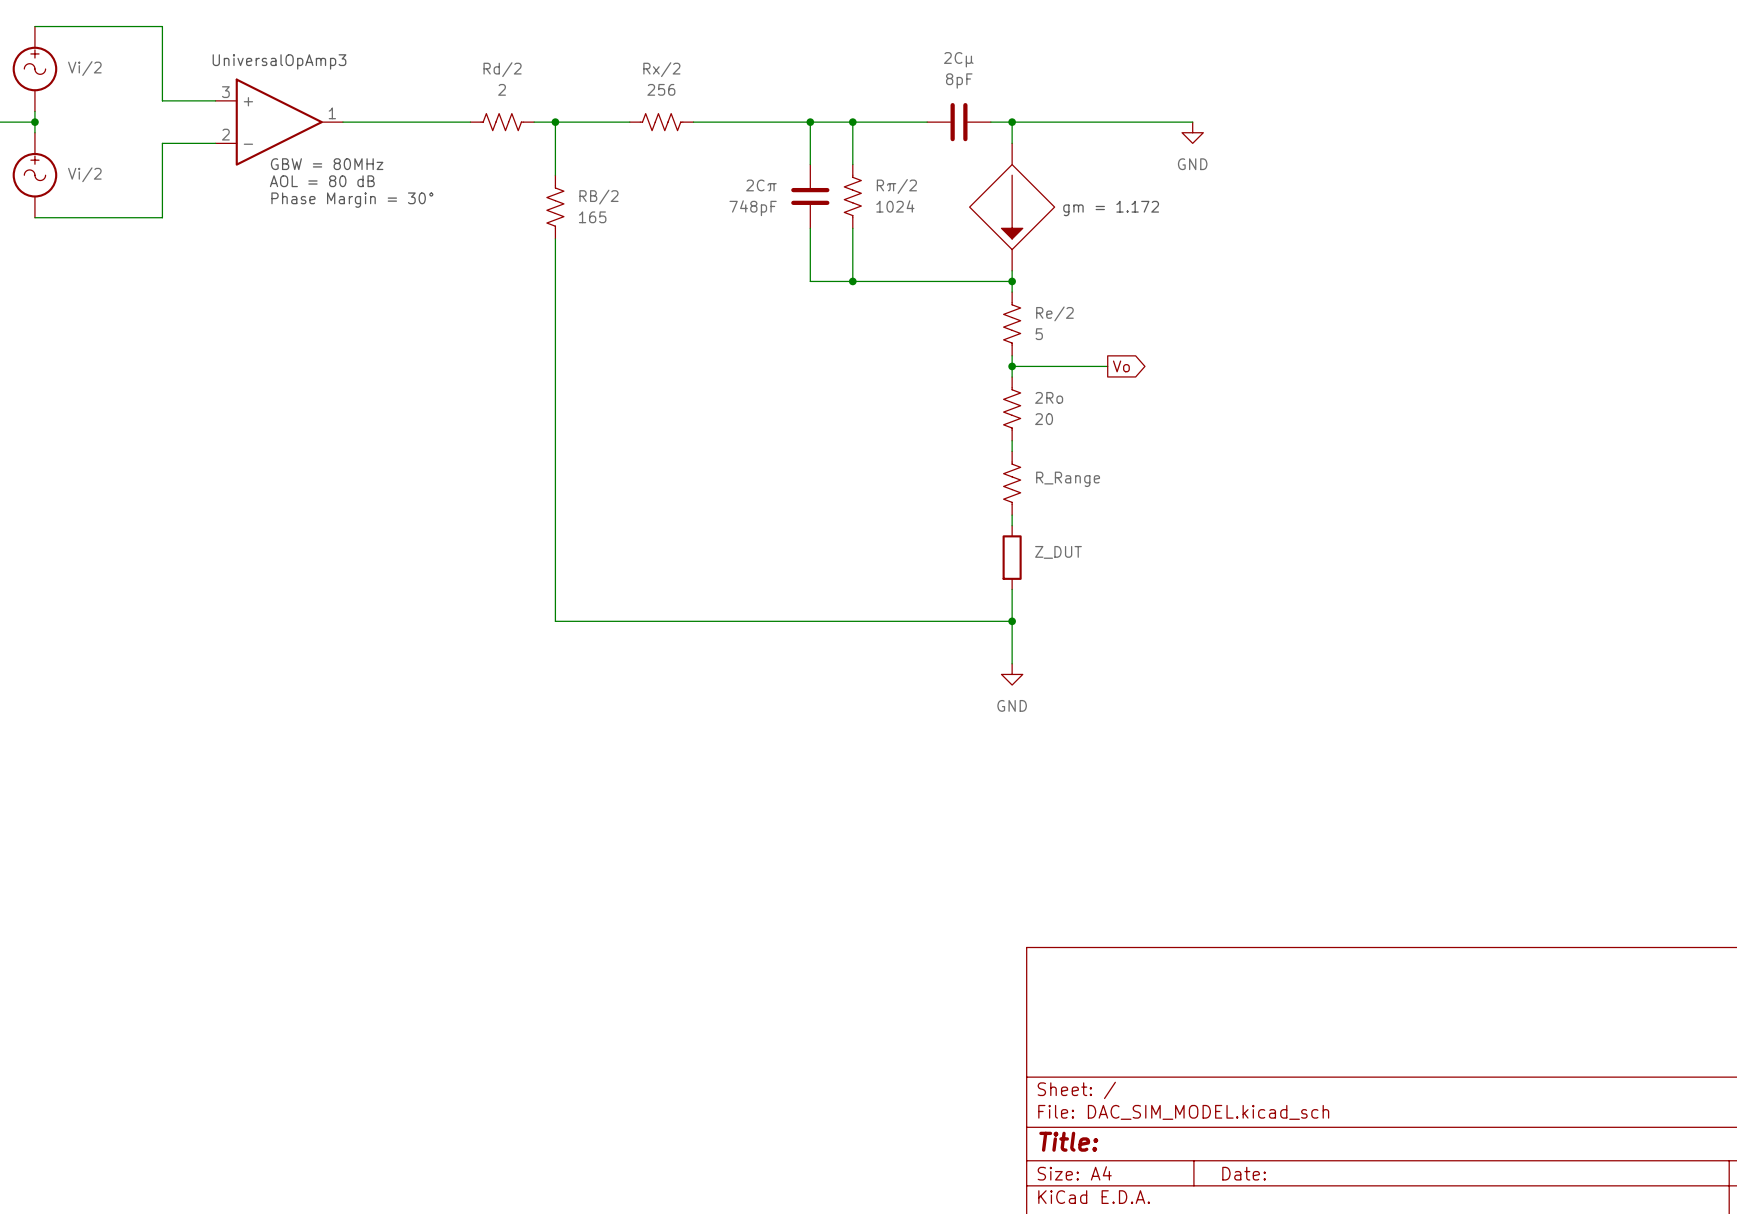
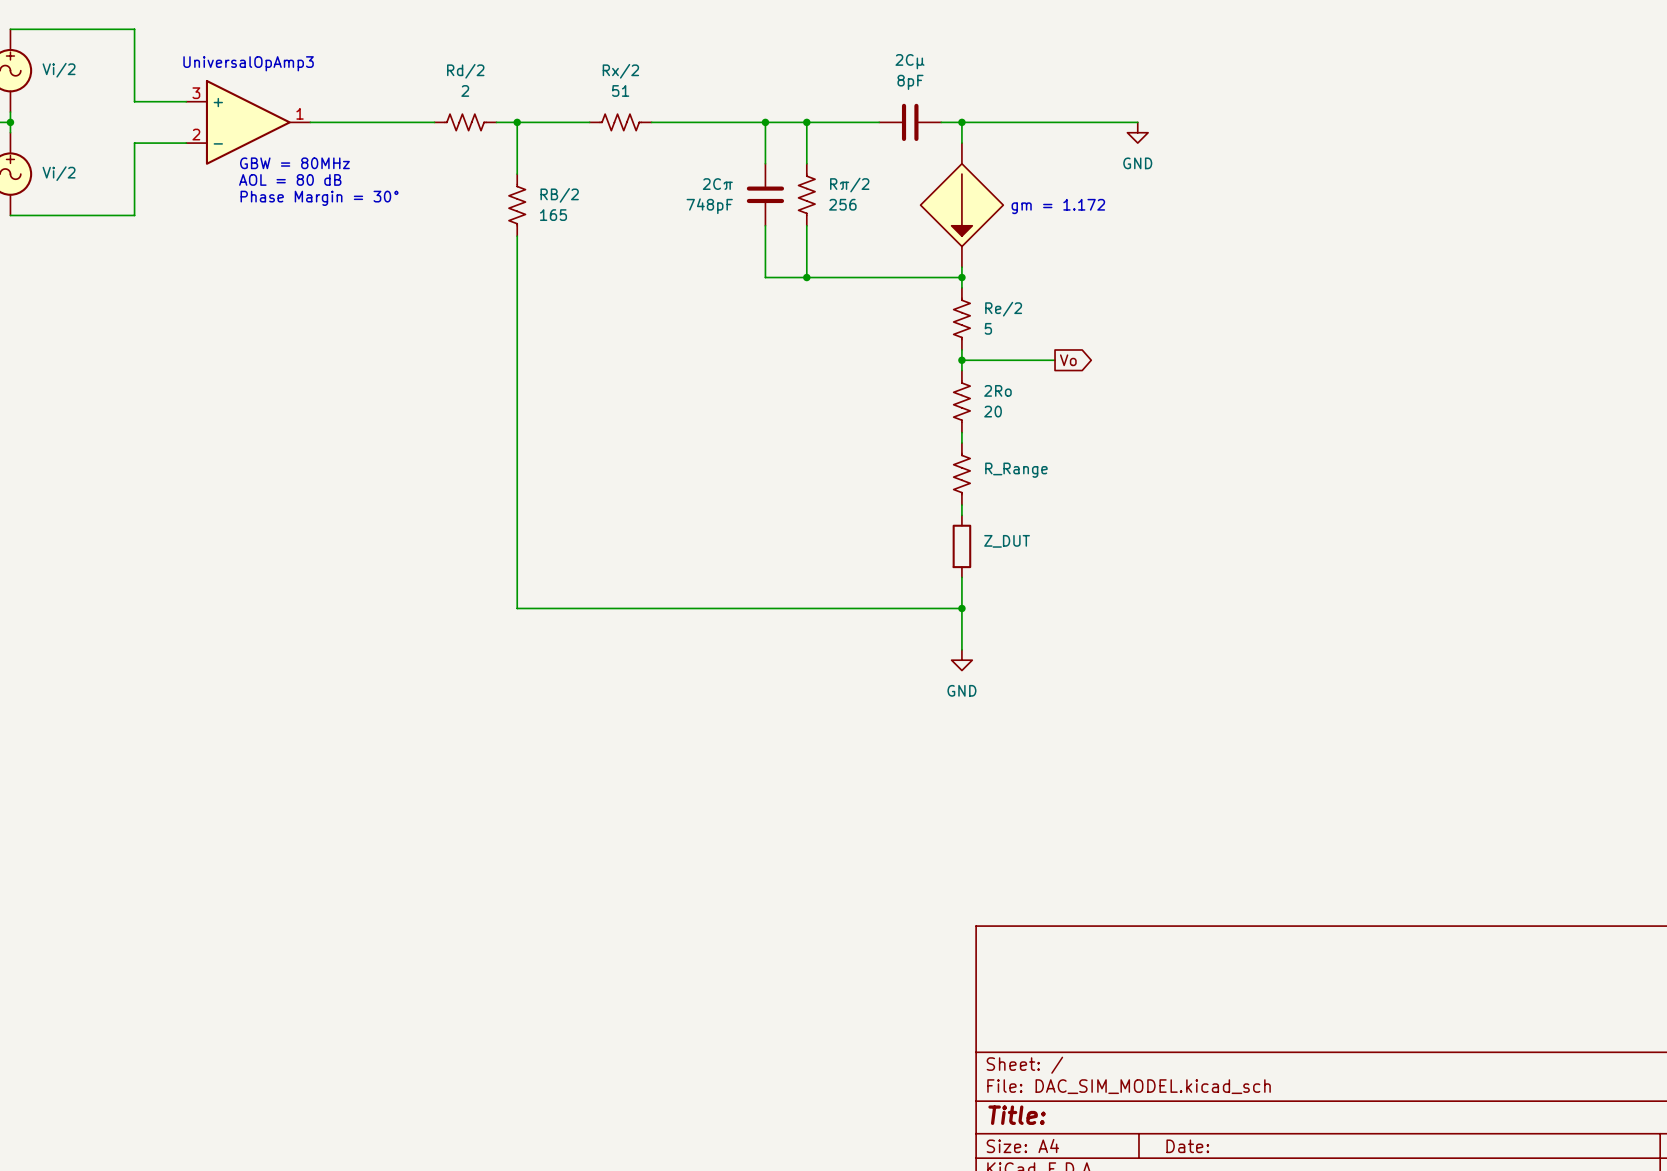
Rx/2 value: 256 (661, 89) -> 51 (620, 90)
Rπ/2 value: 1024 (895, 206) -> 256 (842, 204)

